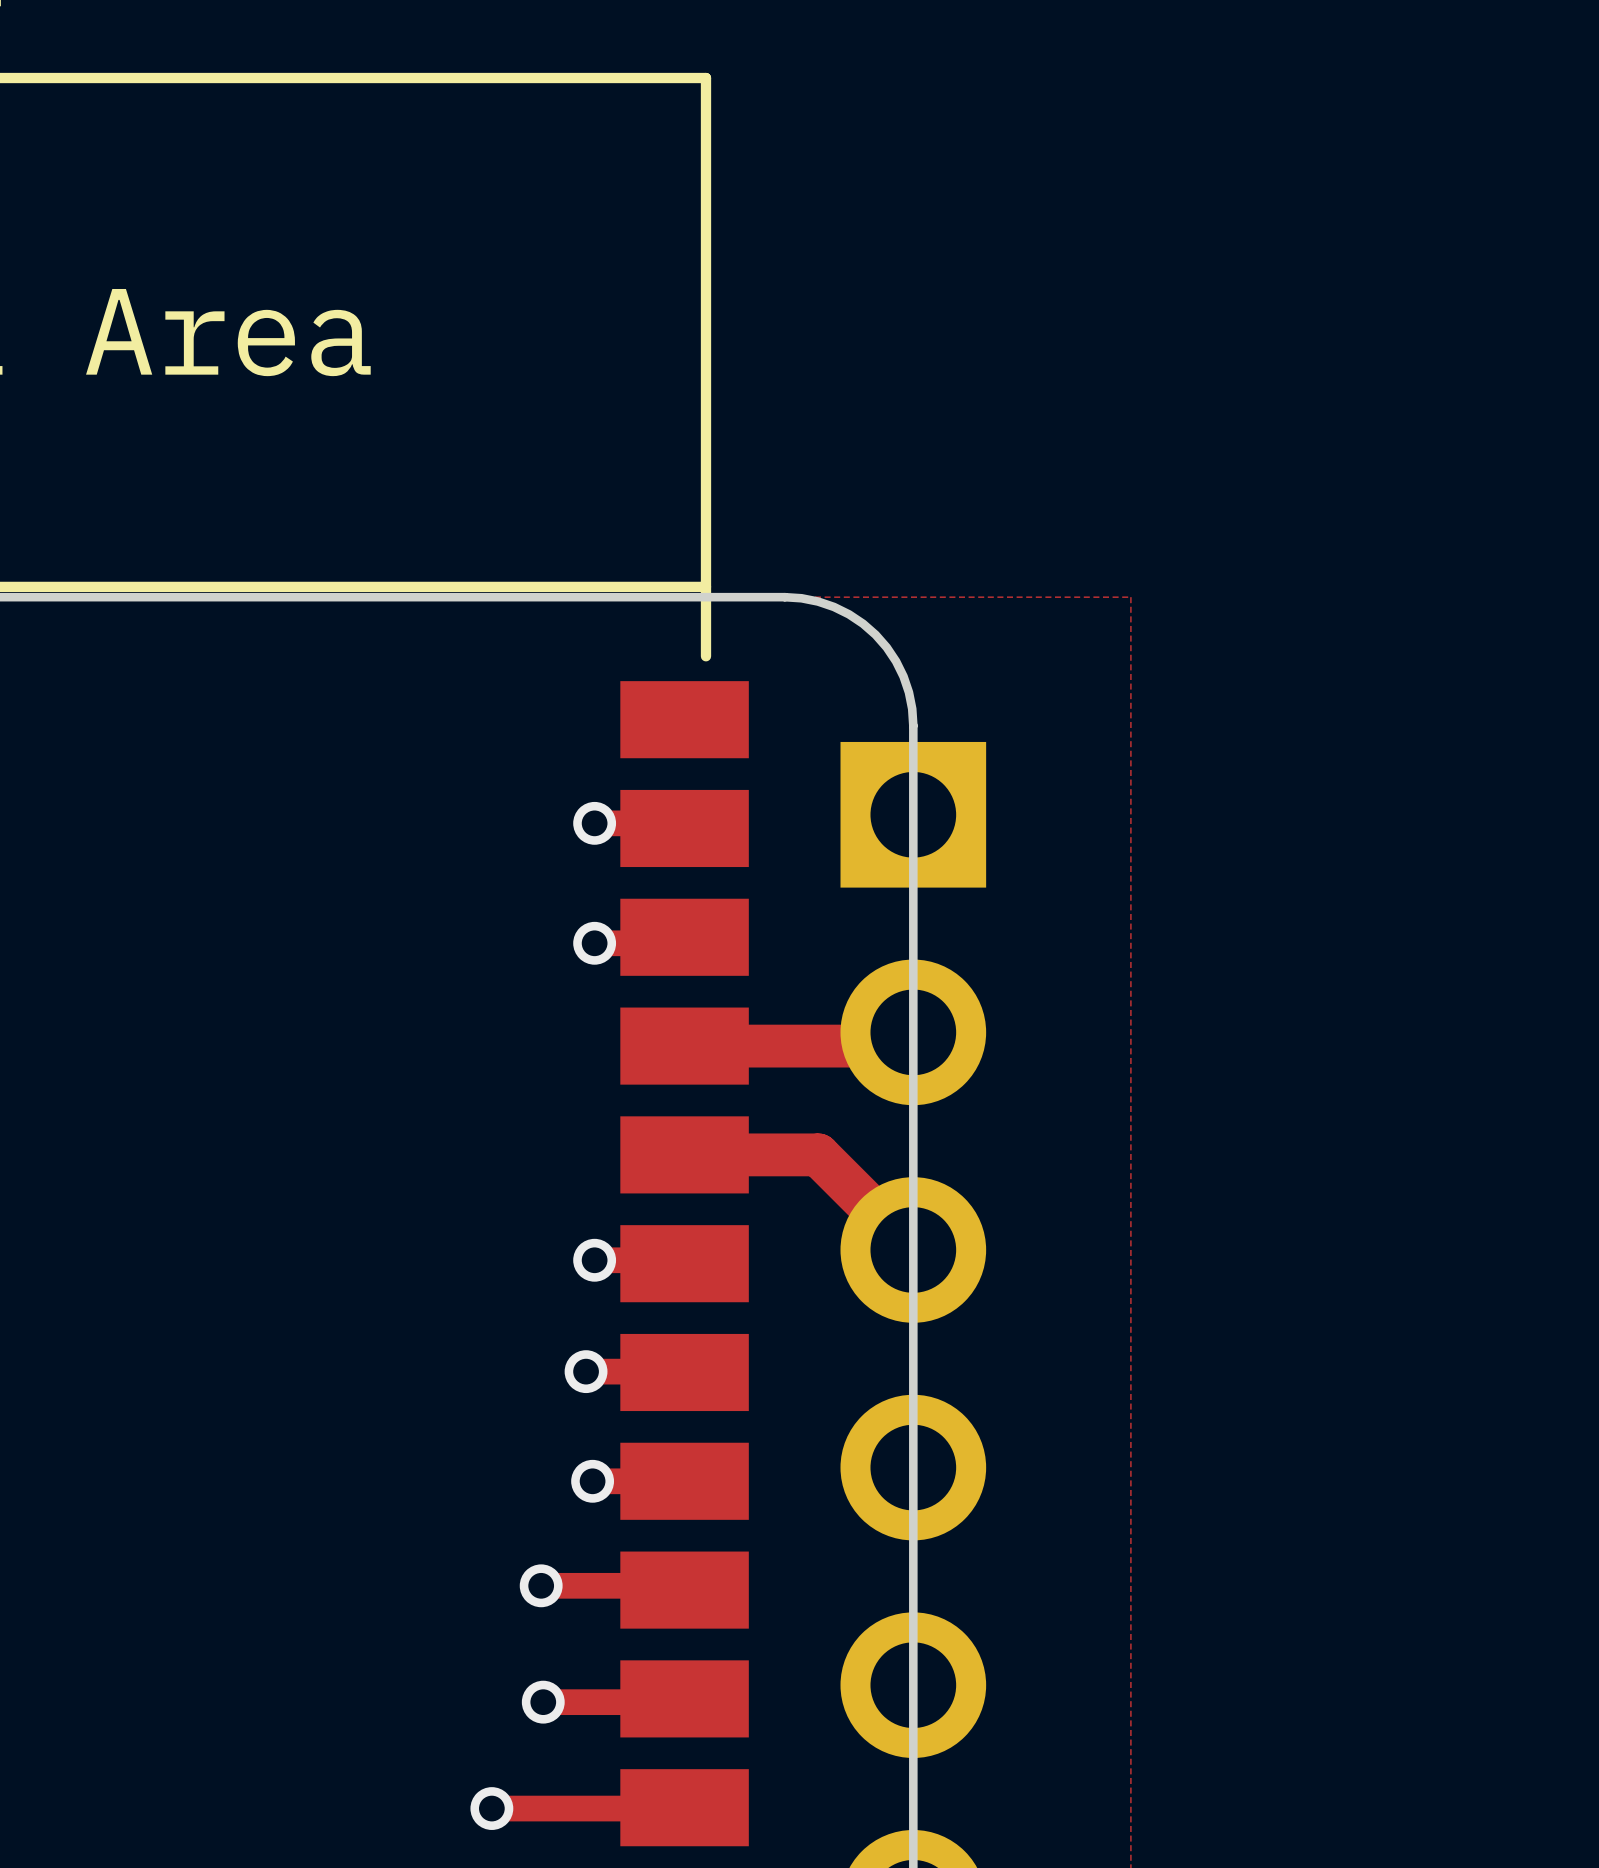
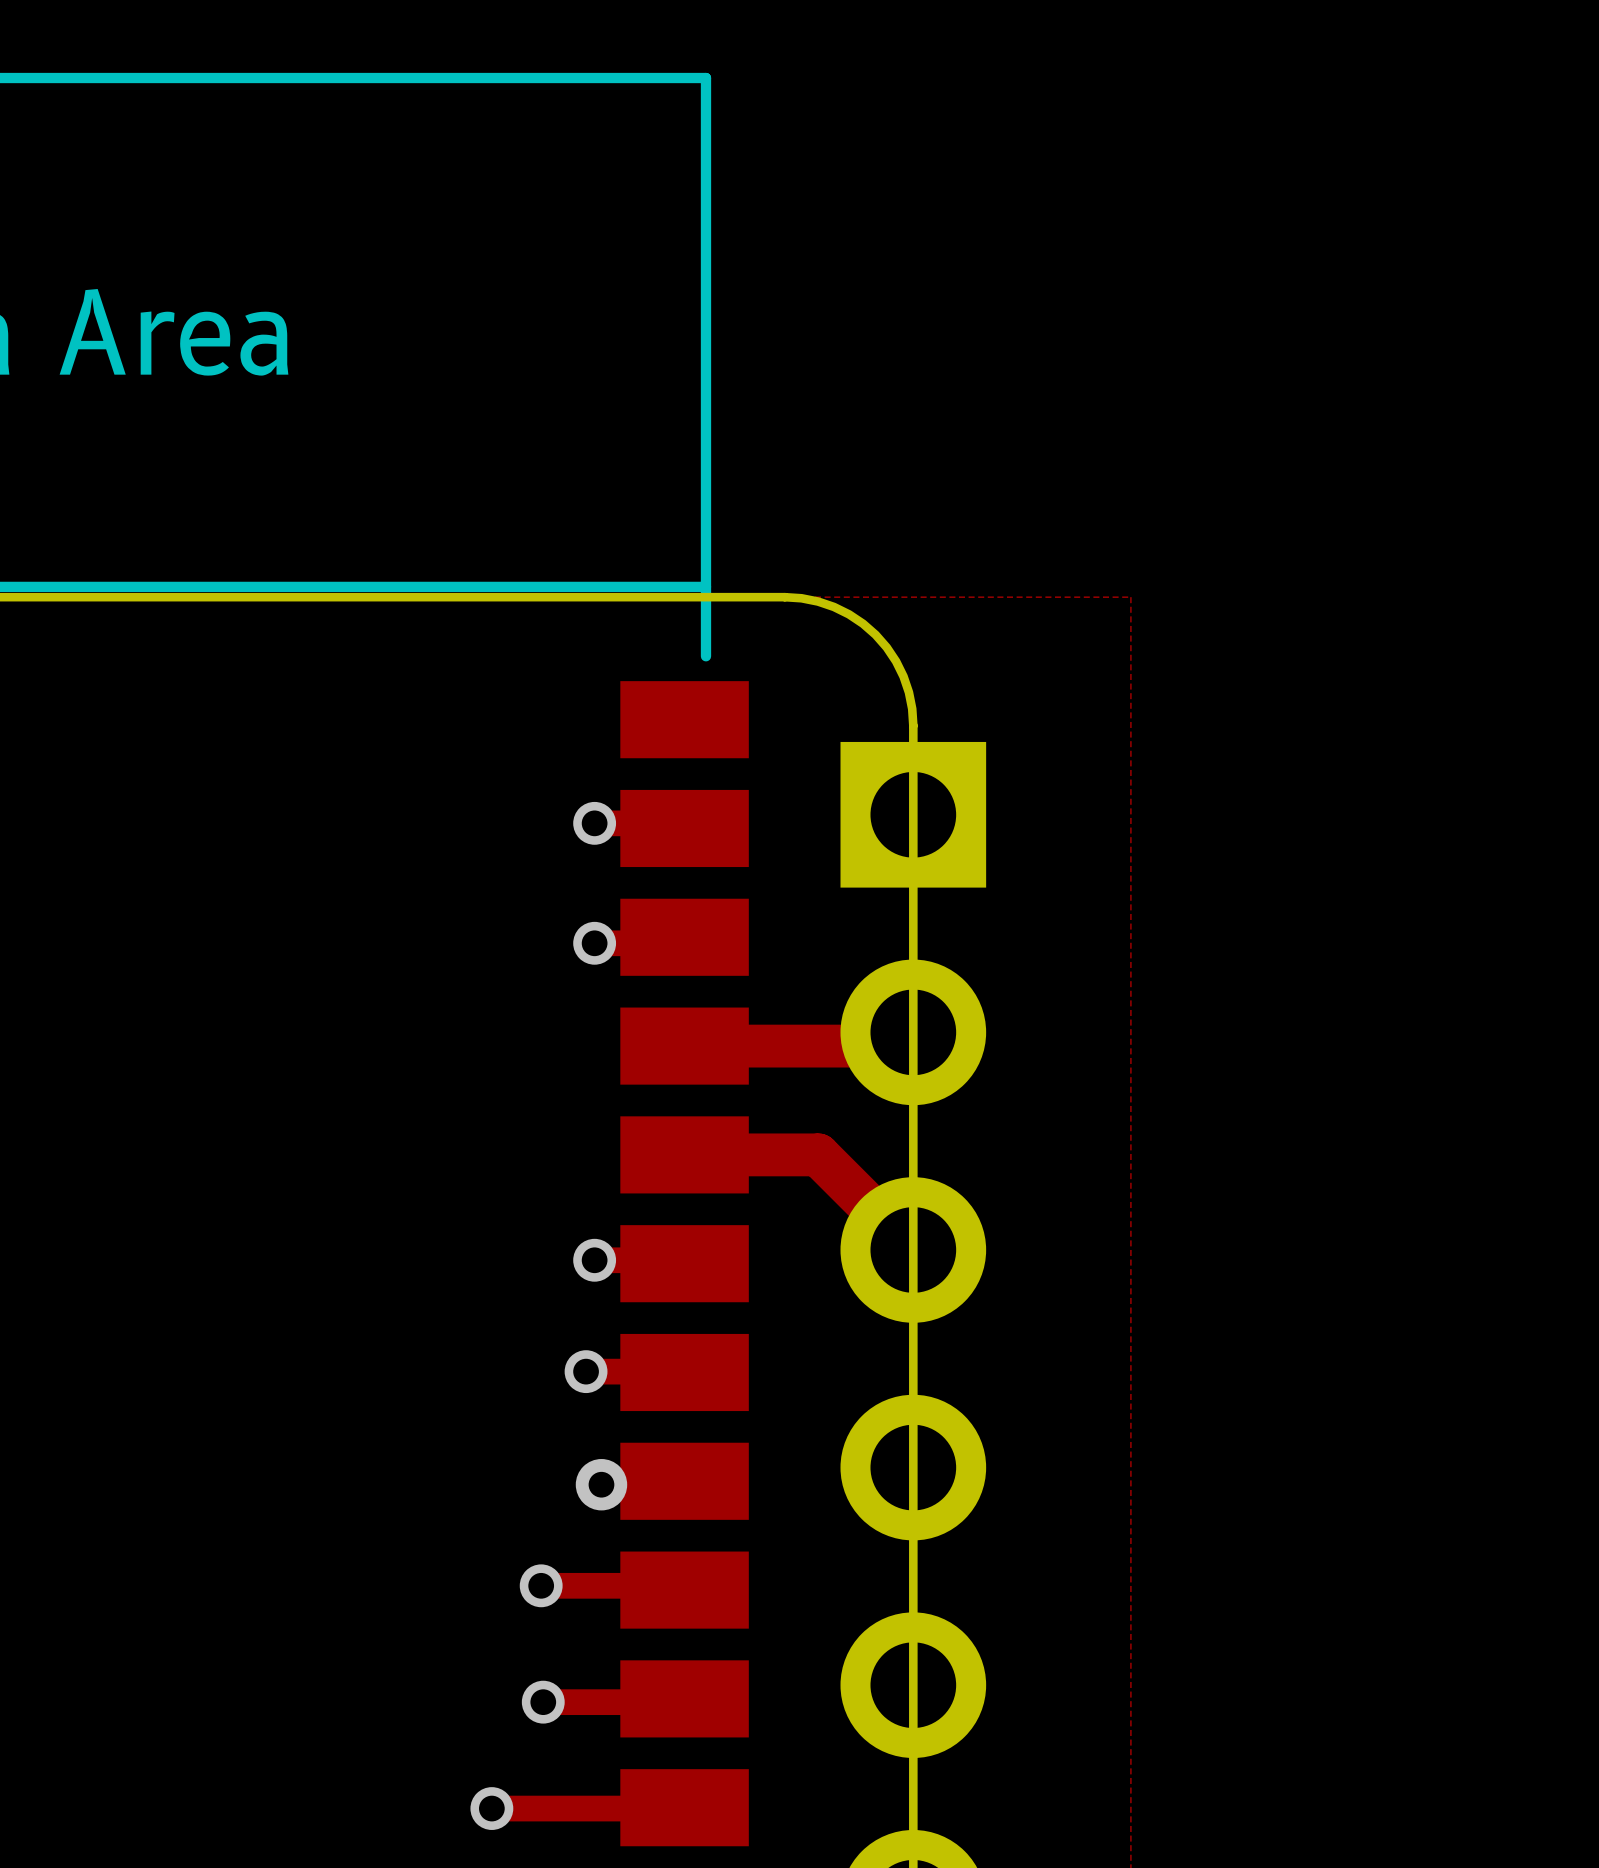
via size: [571, 1459, 615, 1503] -> [575, 1459, 628, 1511]

